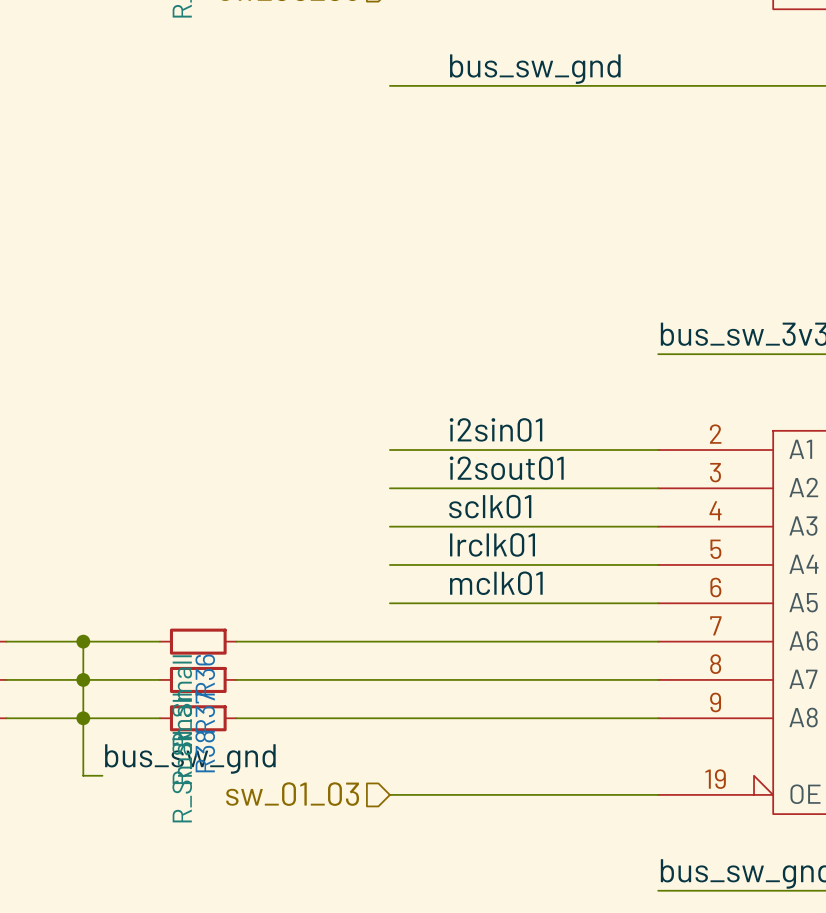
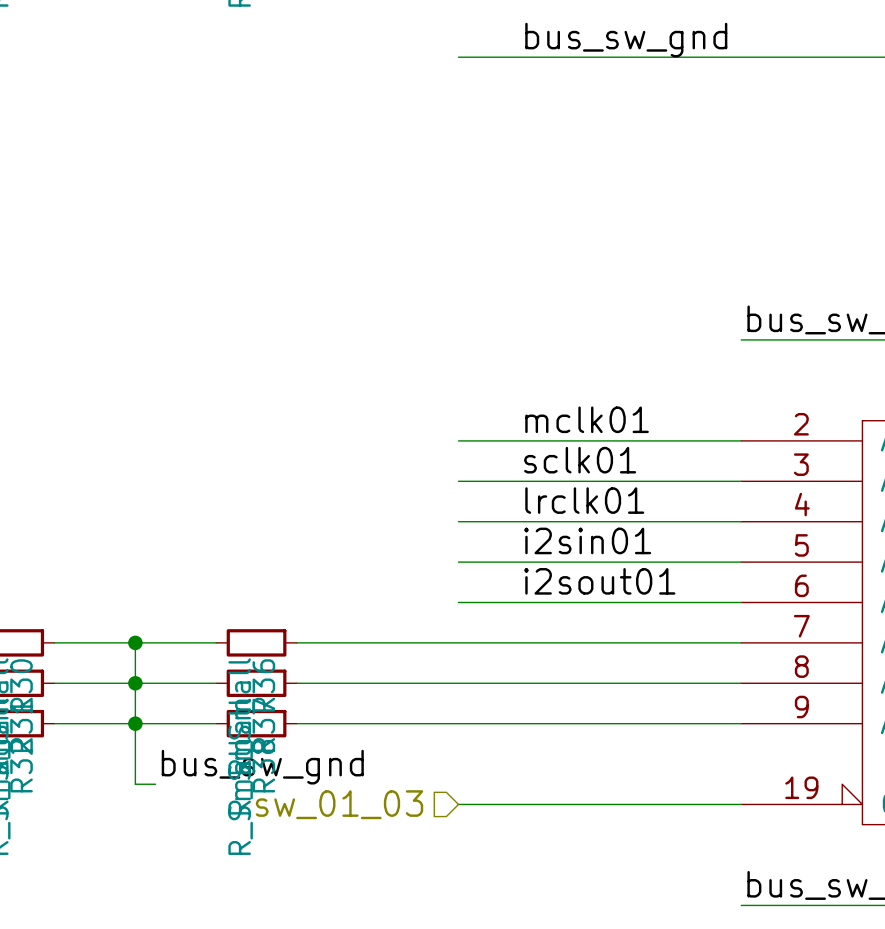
label: i2sin01 (496, 429) -> mclk01 (587, 419)
label: i2sout01 (506, 468) -> sclk01 (580, 460)
label: sclk01 (490, 506) -> lrclk01 (584, 500)
label: lrclk01 (492, 544) -> i2sin01 (587, 540)
label: mclk01 (496, 583) -> i2sout01 (599, 581)

